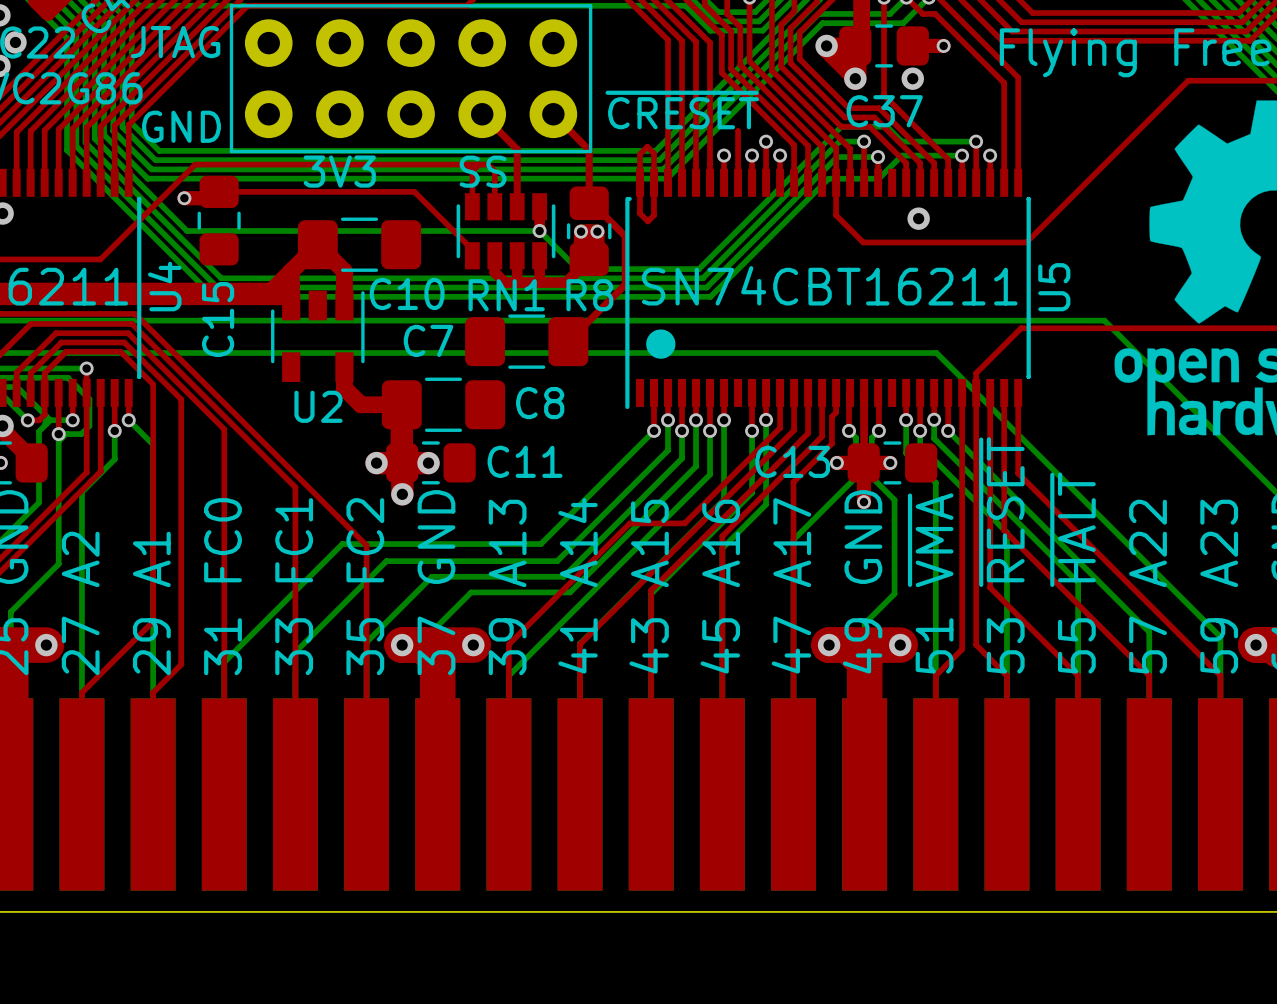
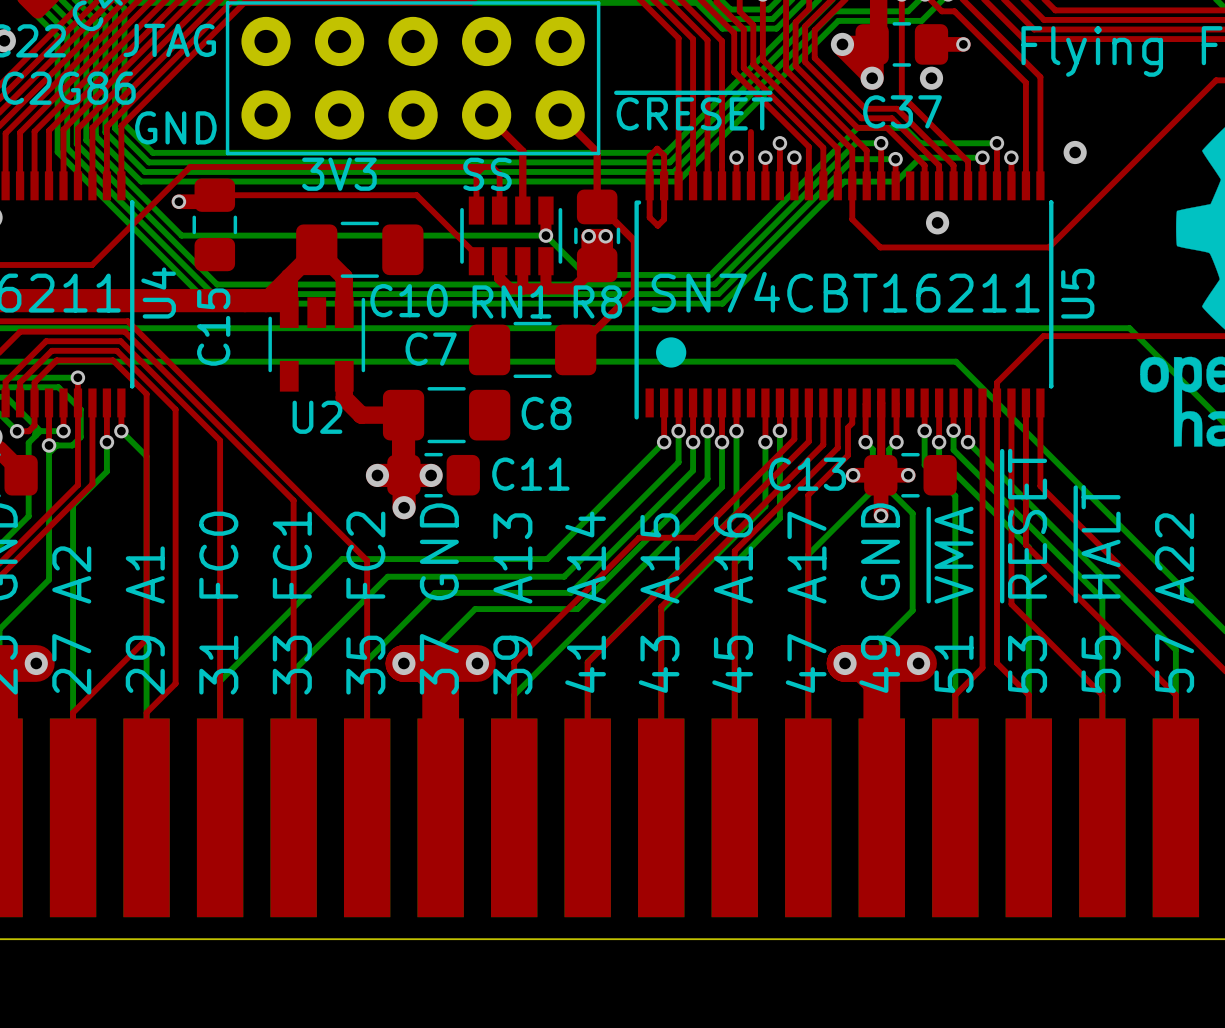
via: none -> (1075, 152)

